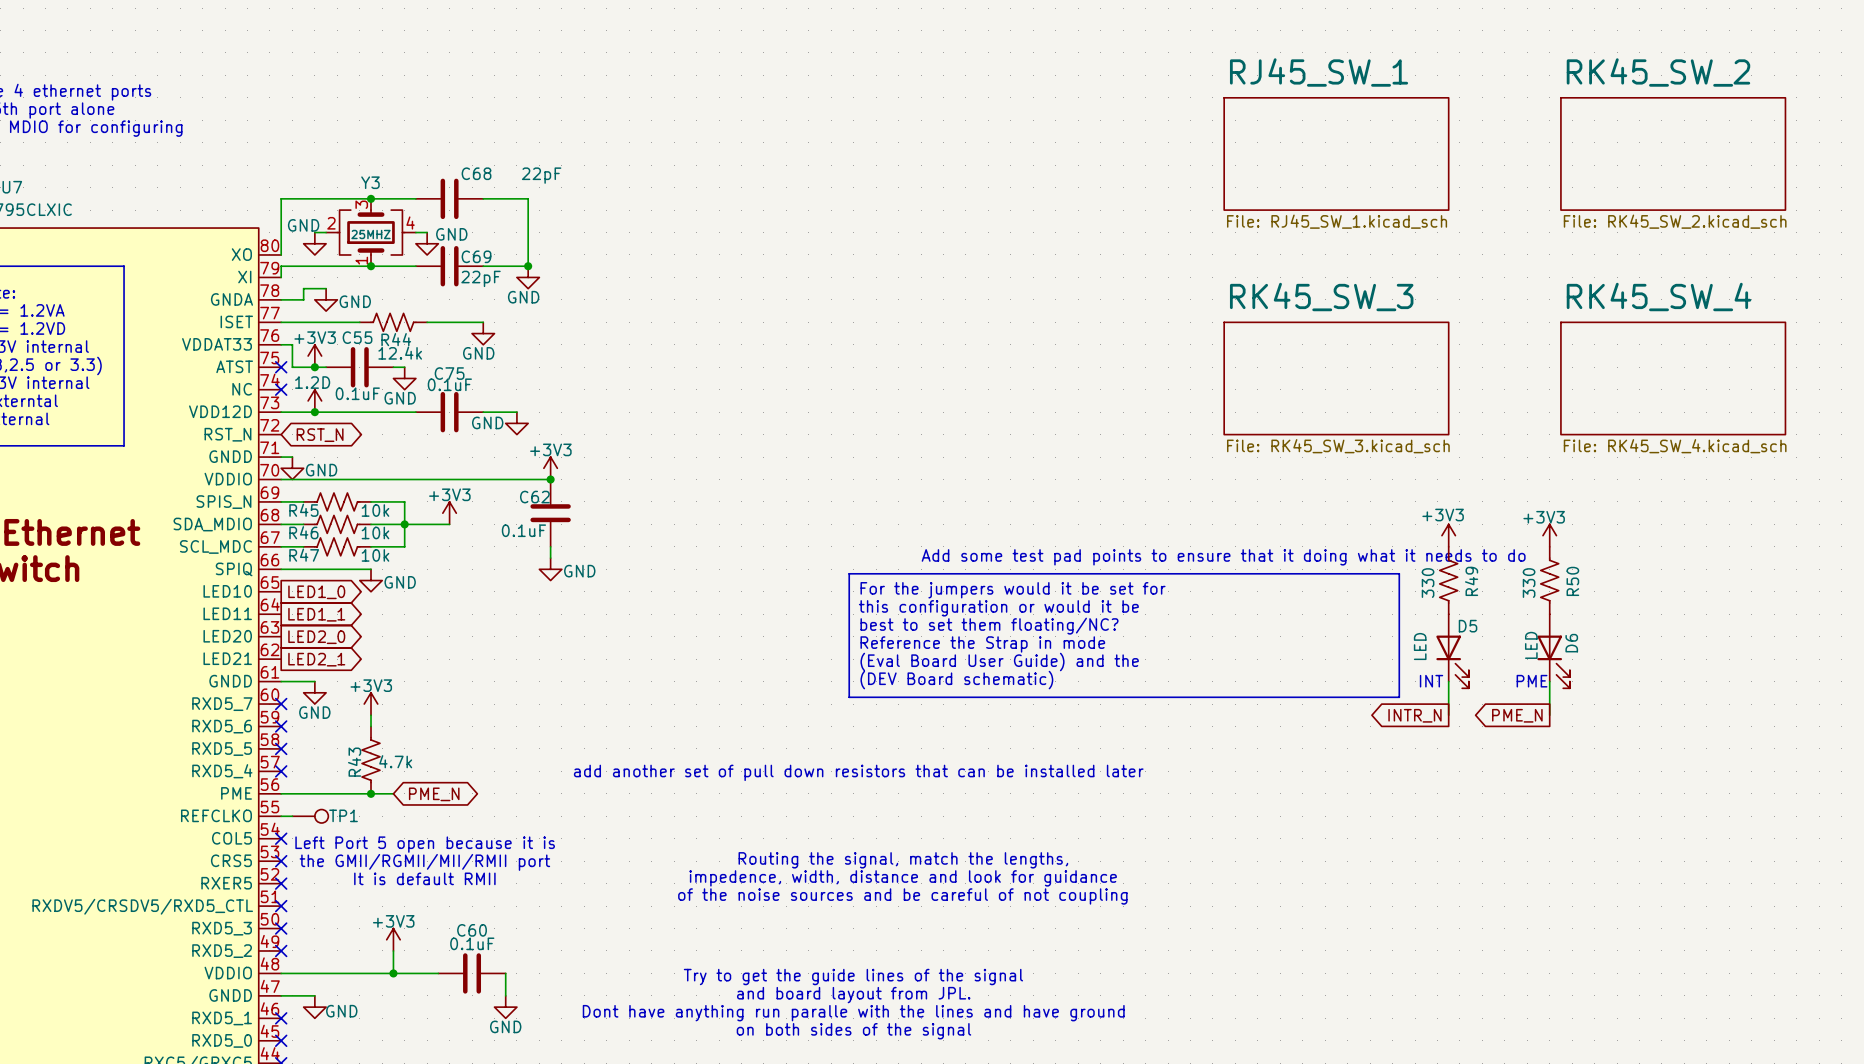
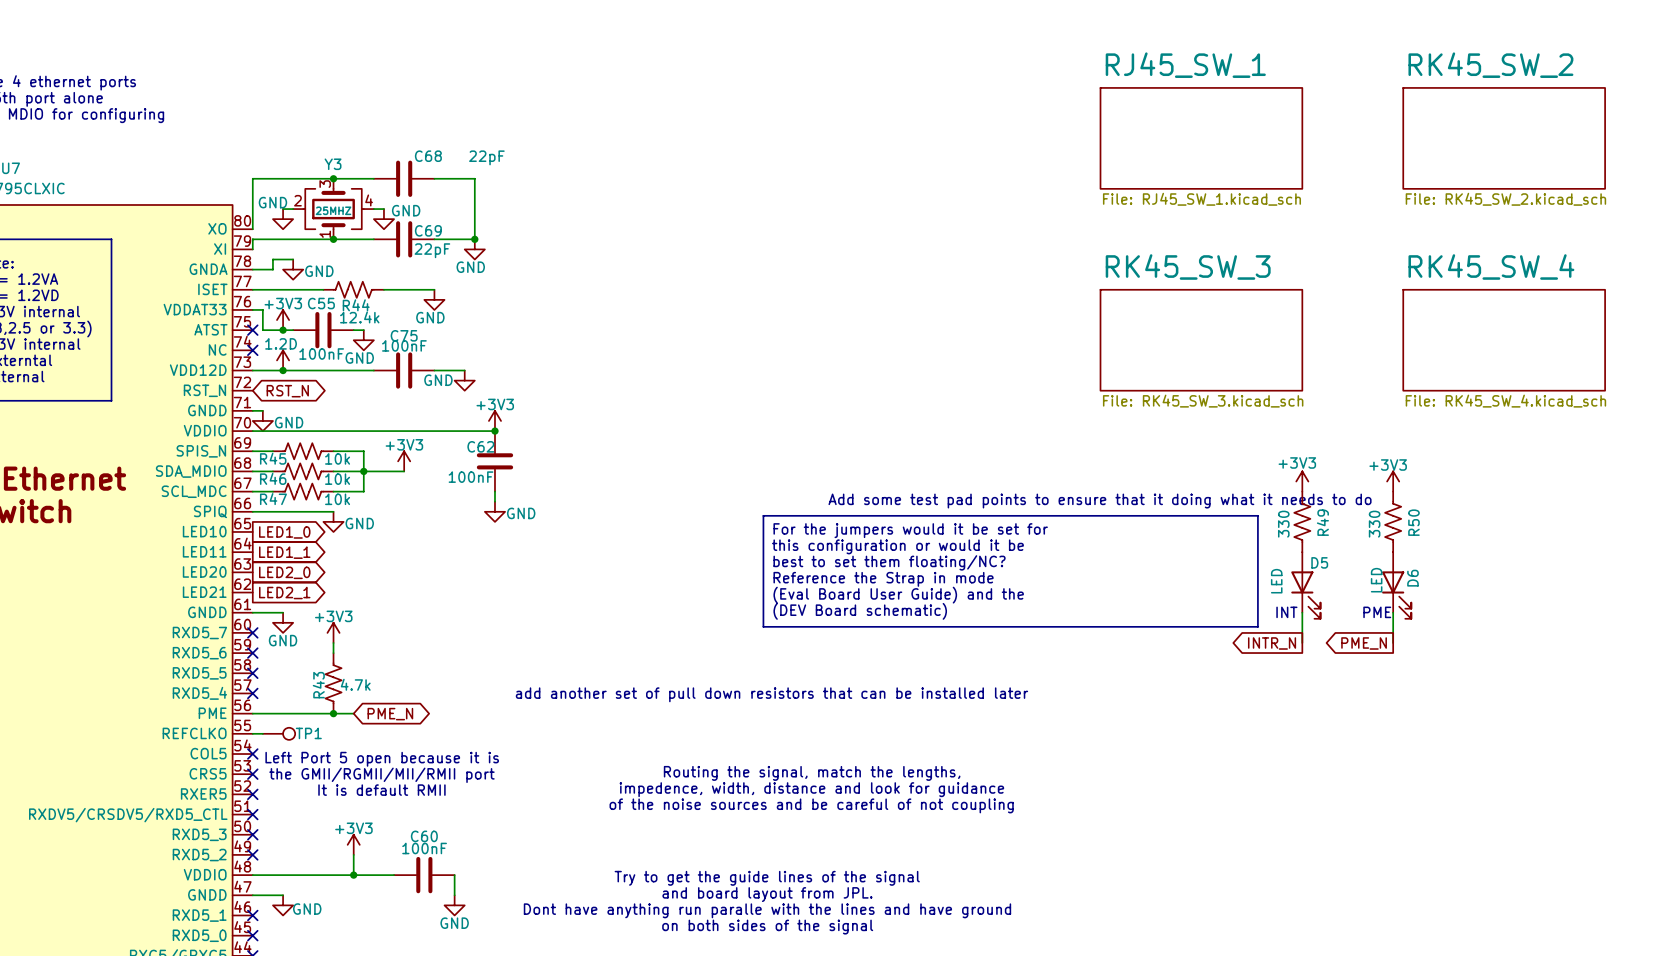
C75 value: 0.1uF (449, 384) -> 100nF (404, 345)
C55 value: 0.1uF (357, 393) -> 100nF (321, 353)
C62 value: 0.1uF (523, 530) -> 100nF (471, 477)
C60 value: 0.1uF (472, 943) -> 100nF (424, 848)

